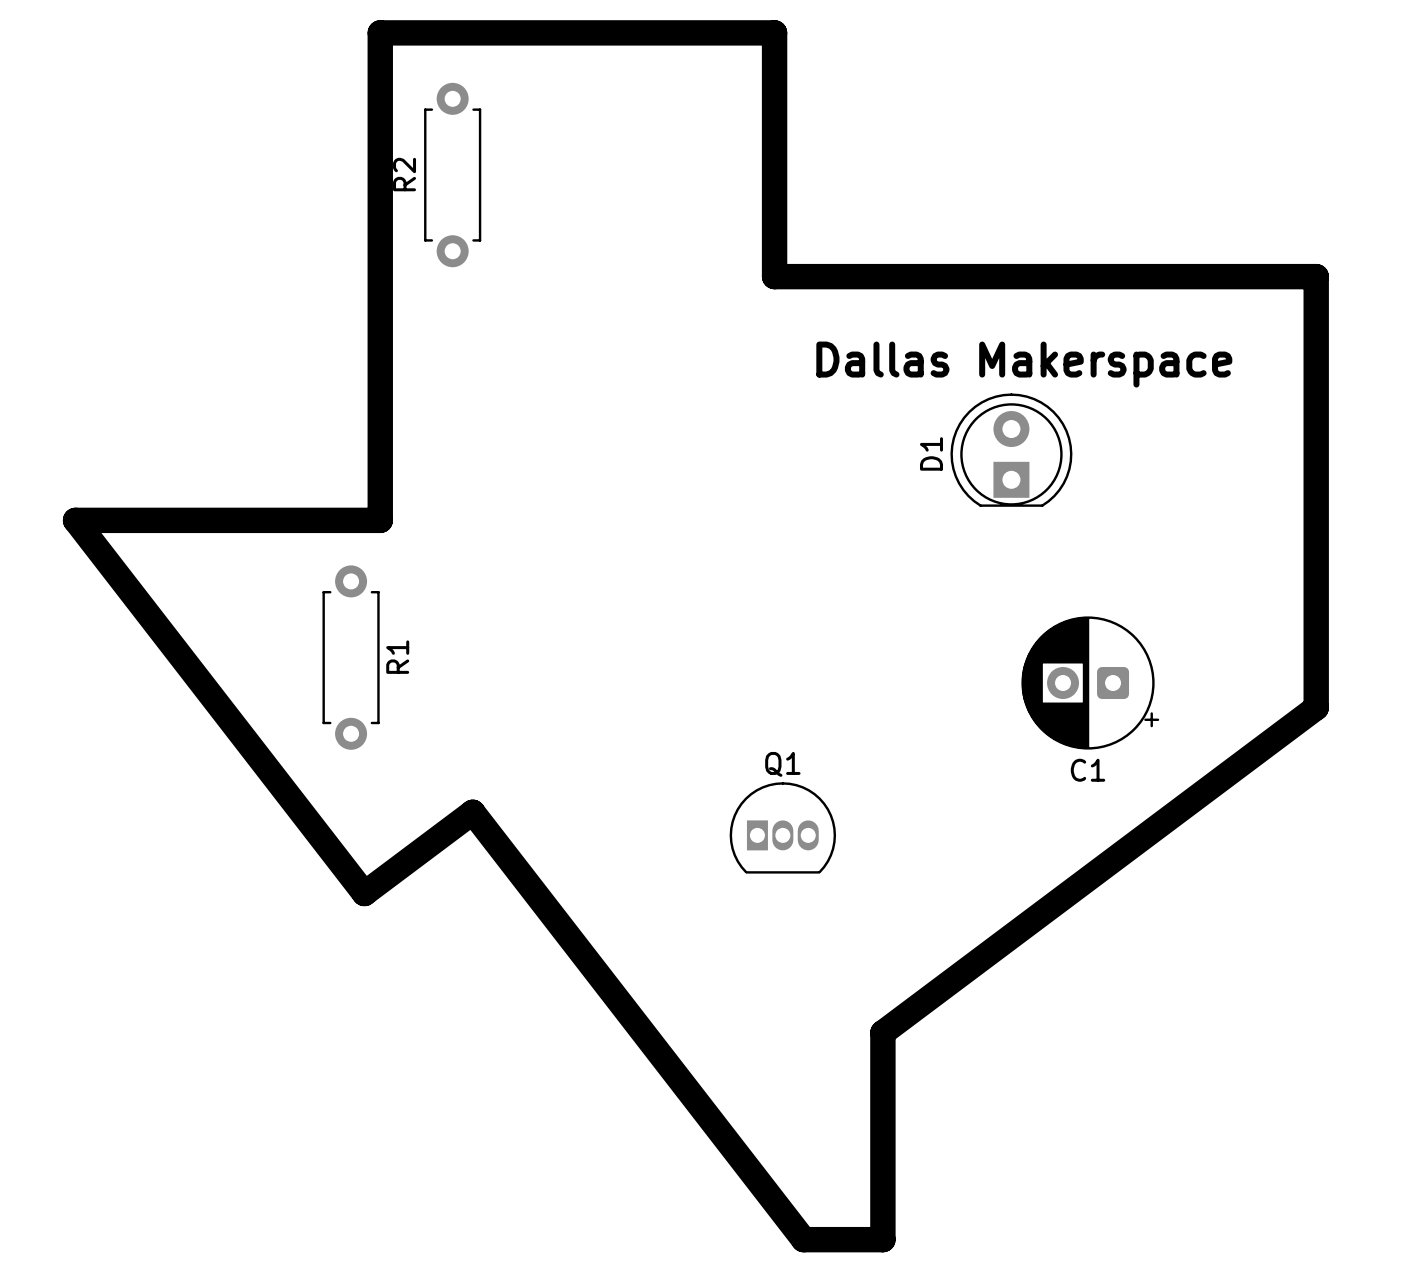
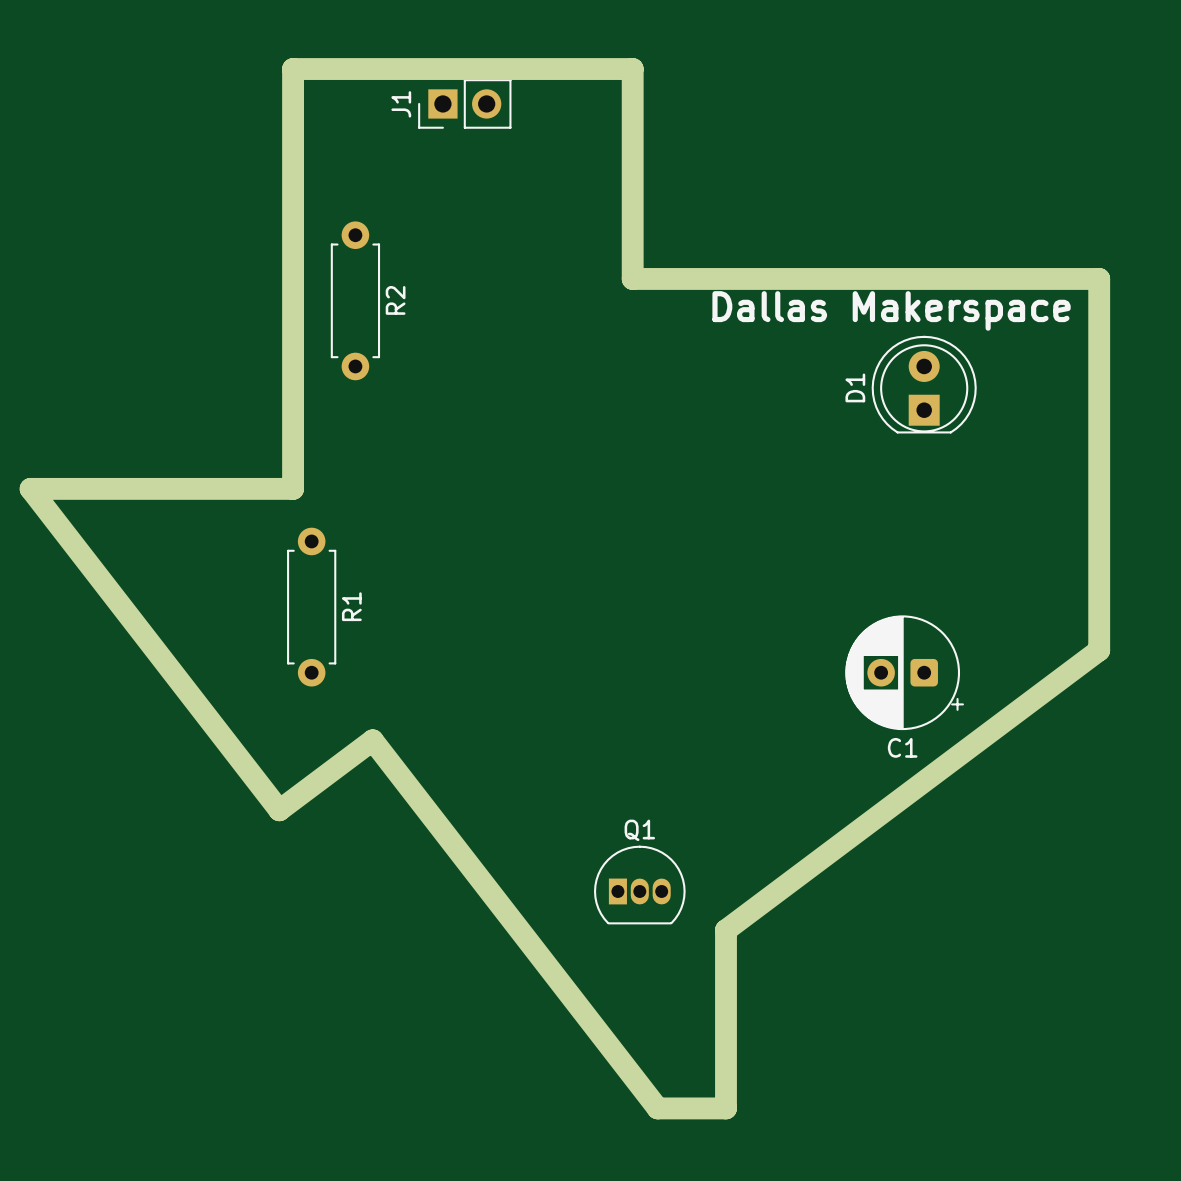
J1: none -> (464, 103)
R2 name position: R2 (404, 174) -> R2 (395, 300)
R2 position: (452, 175) -> (355, 300)
text position: Dallas Makerspace (1024, 364) -> Dallas Makerspace (891, 310)
D1 position: (1011, 450) -> (924, 384)
R1 position: (351, 657) -> (311, 607)
C1 position: (1090, 683) -> (904, 672)
Q1 position: (782, 827) -> (639, 885)

